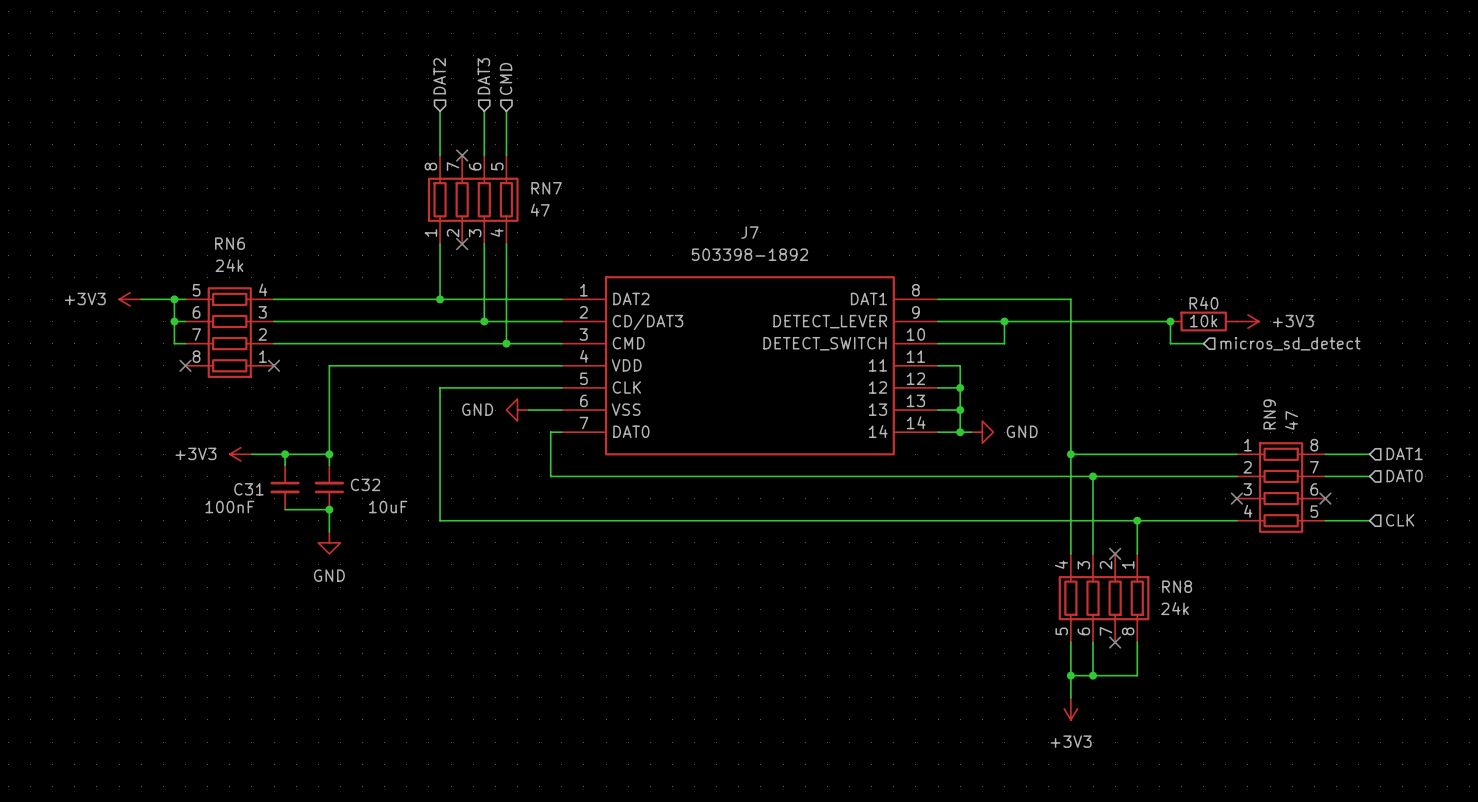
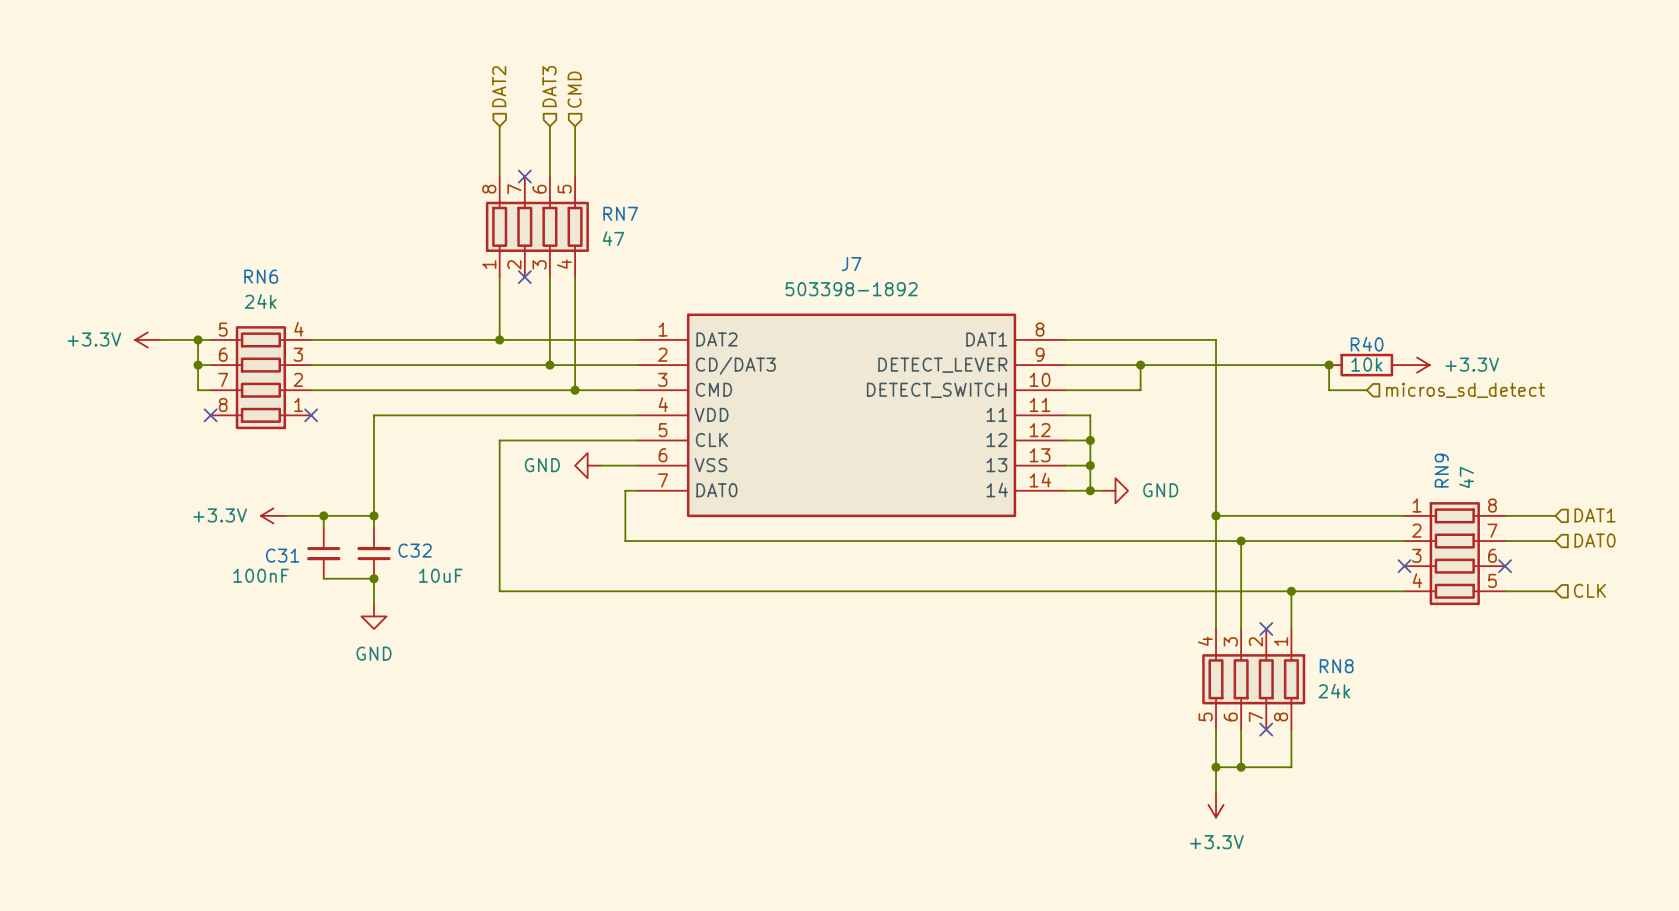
power symbol: +3V3 (130, 299) -> +3.3V (147, 339)
power symbol: +3V3 (1247, 321) -> +3.3V (1417, 365)
power symbol: +3V3 (240, 454) -> +3.3V (273, 515)
power symbol: +3V3 (1070, 708) -> +3.3V (1216, 804)

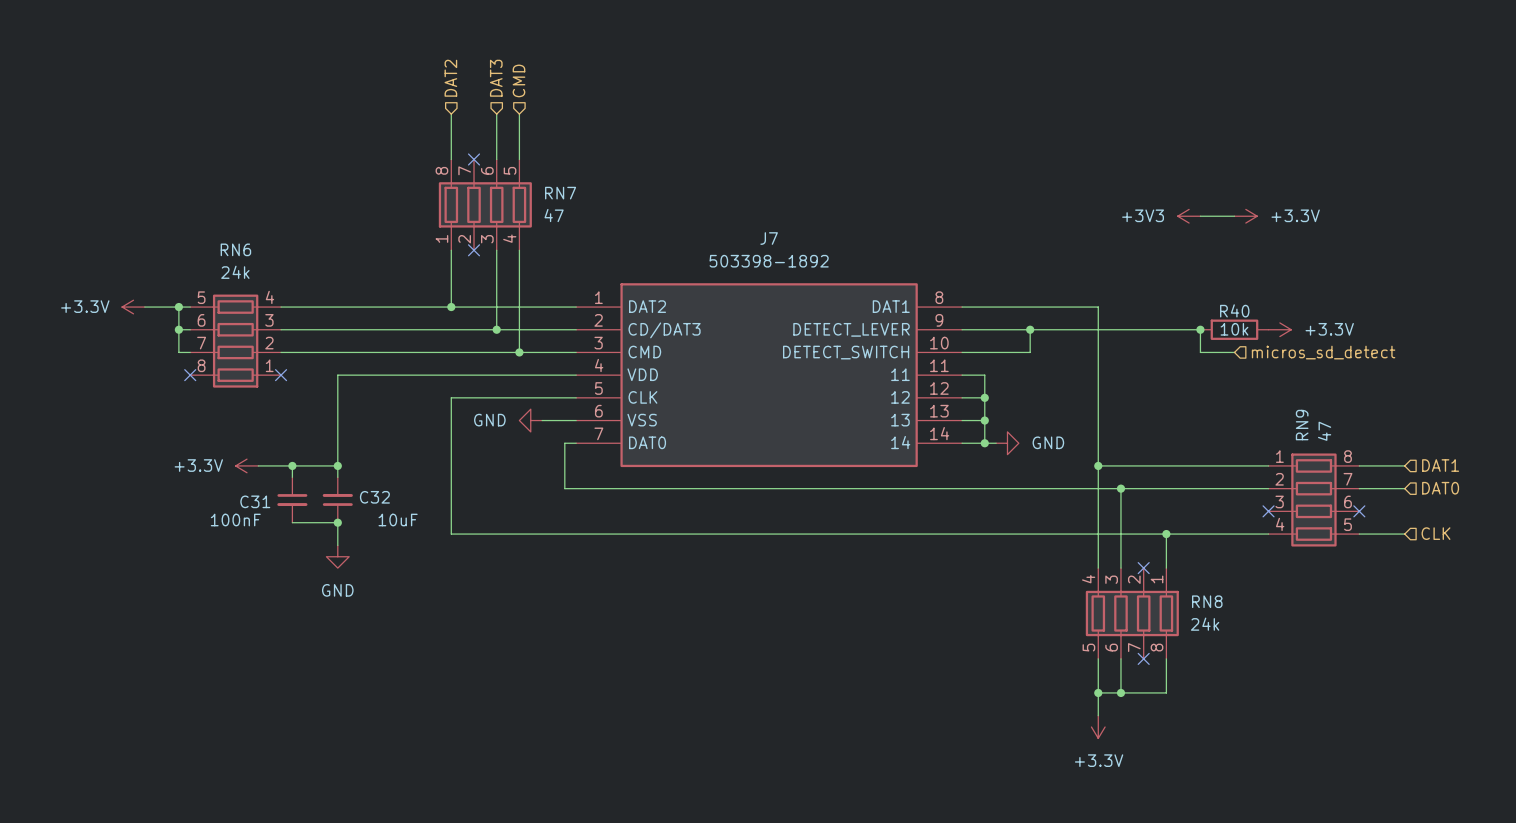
power symbol: none -> +3V3 (1189, 216)
wire: none -> (1200, 216) (1234, 216)
power symbol: none -> +3.3V (1245, 216)

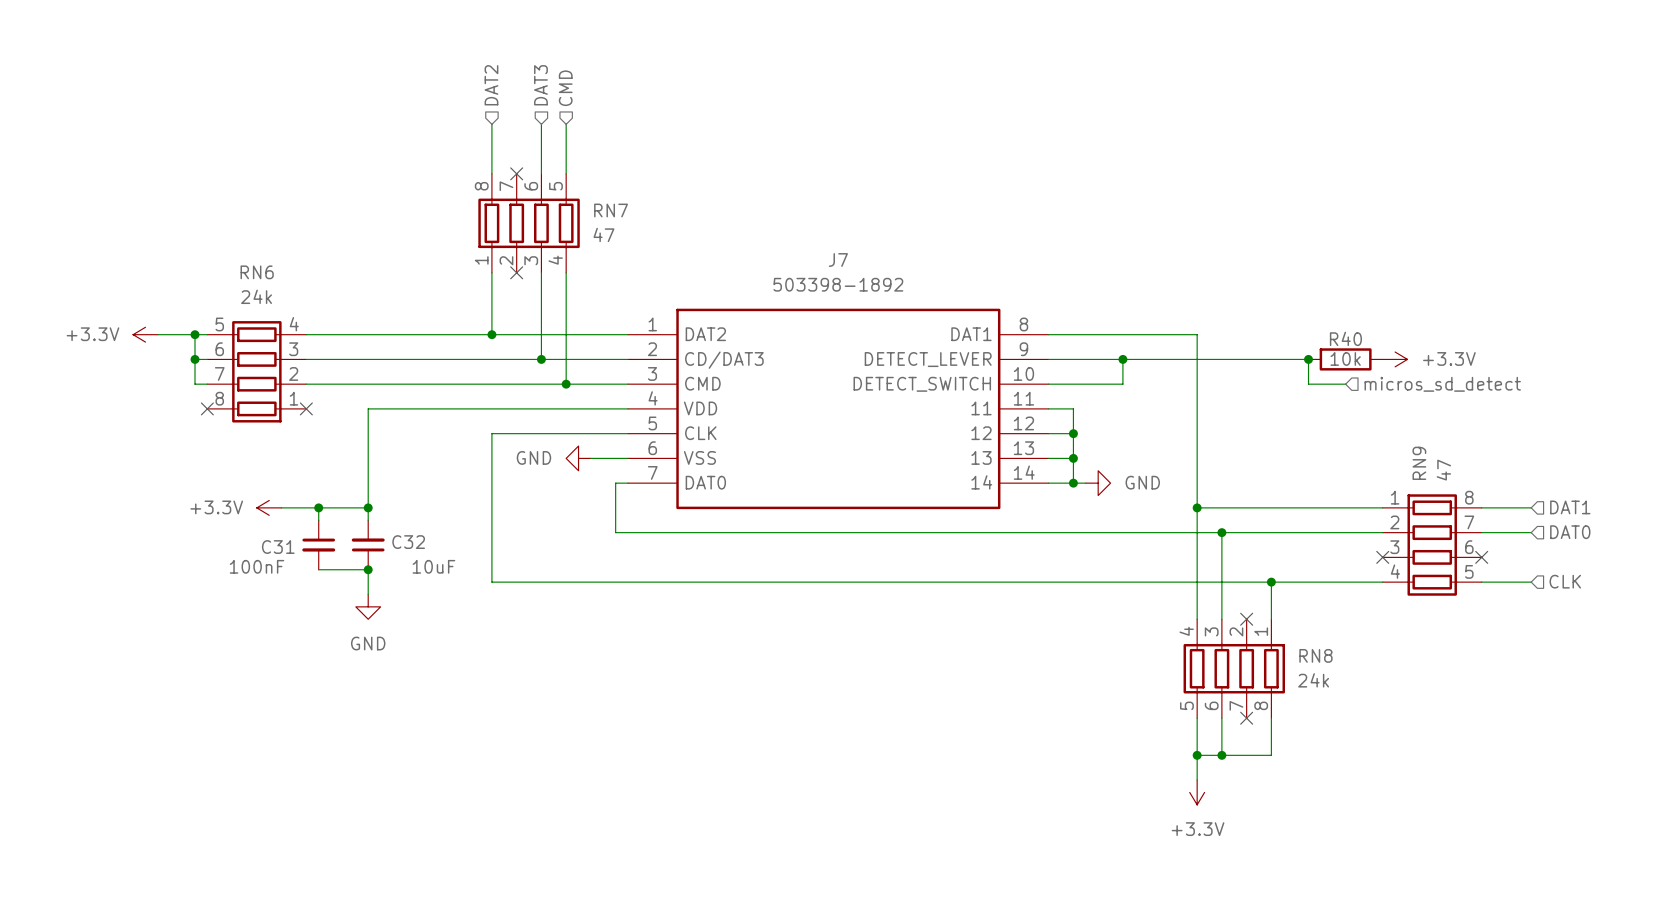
power symbol: +3V3 (1189, 216) -> none
wire: (1200, 216) (1234, 216) -> none
power symbol: +3.3V (1245, 216) -> none

